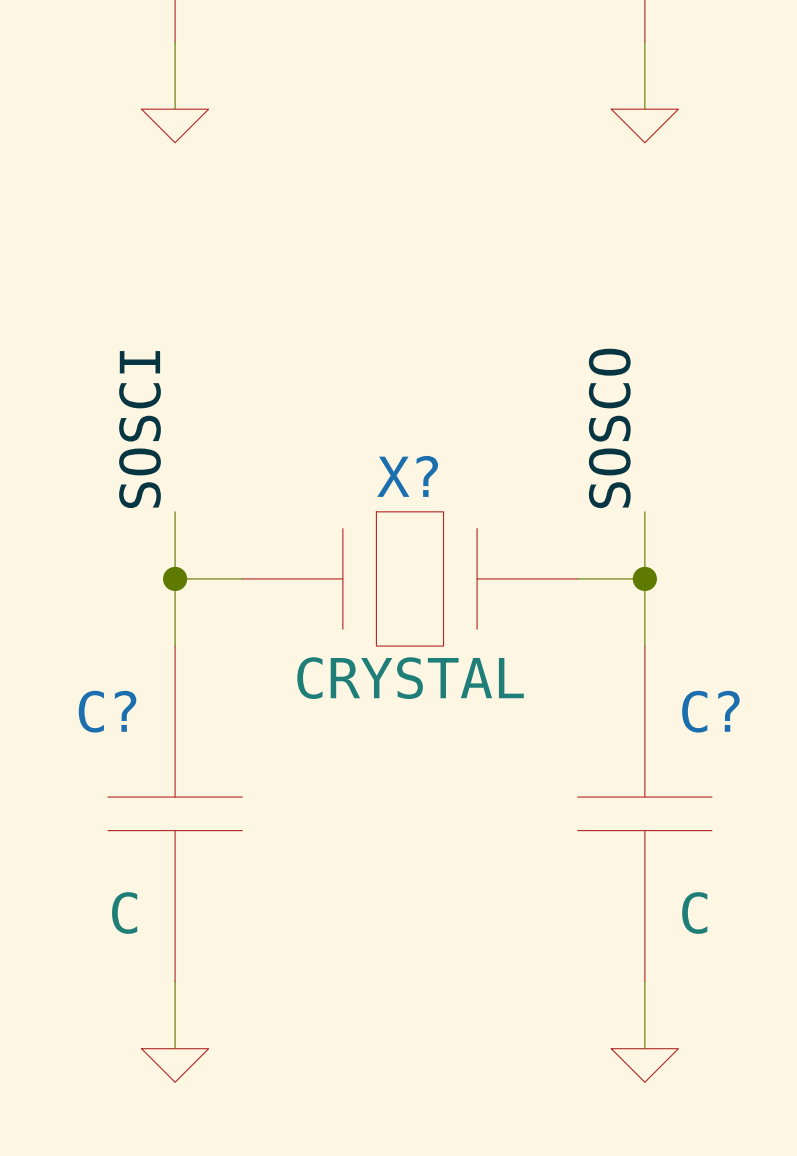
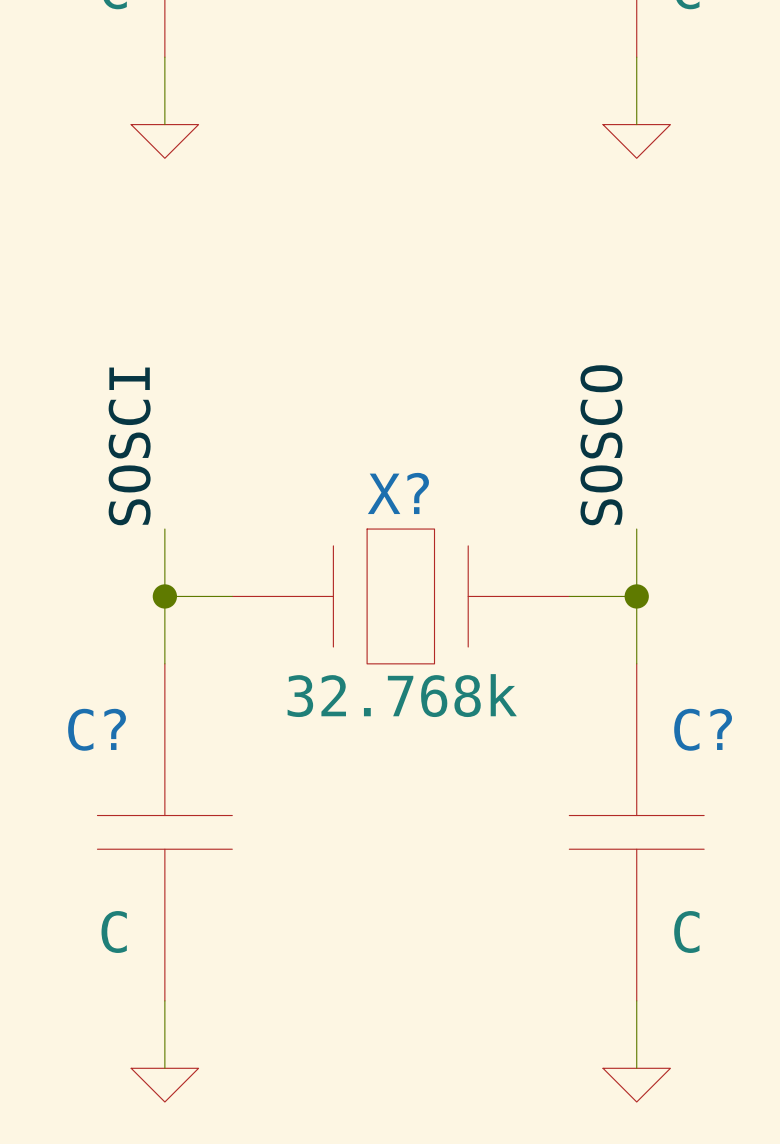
X? value: CRYSTAL (410, 678) -> 32.768k (402, 695)

